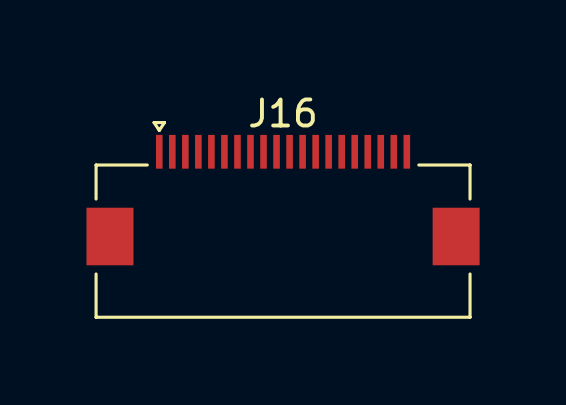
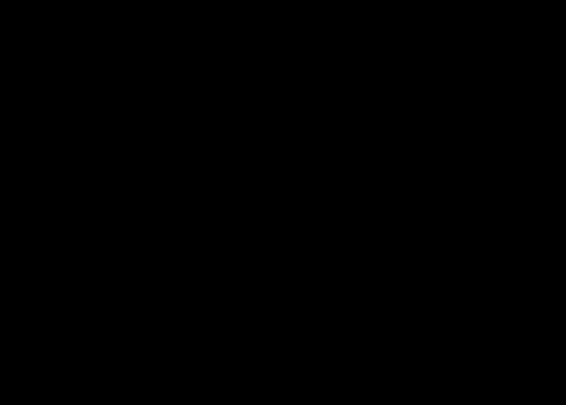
J16: (283, 219) -> none

